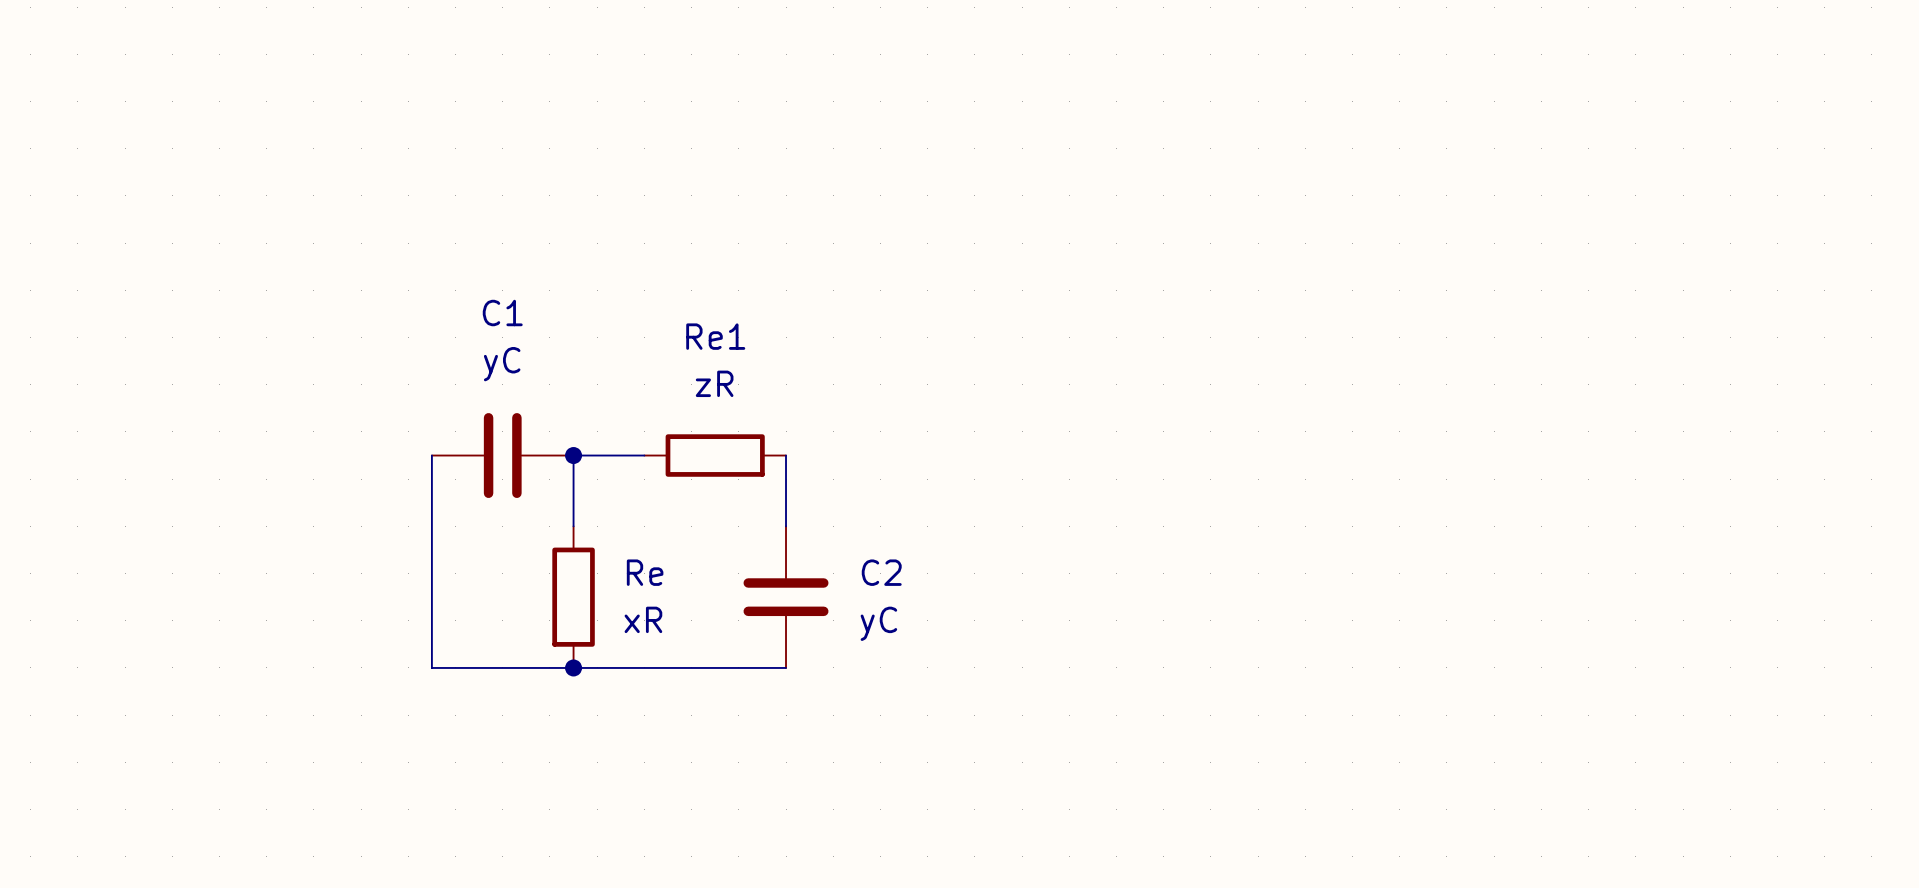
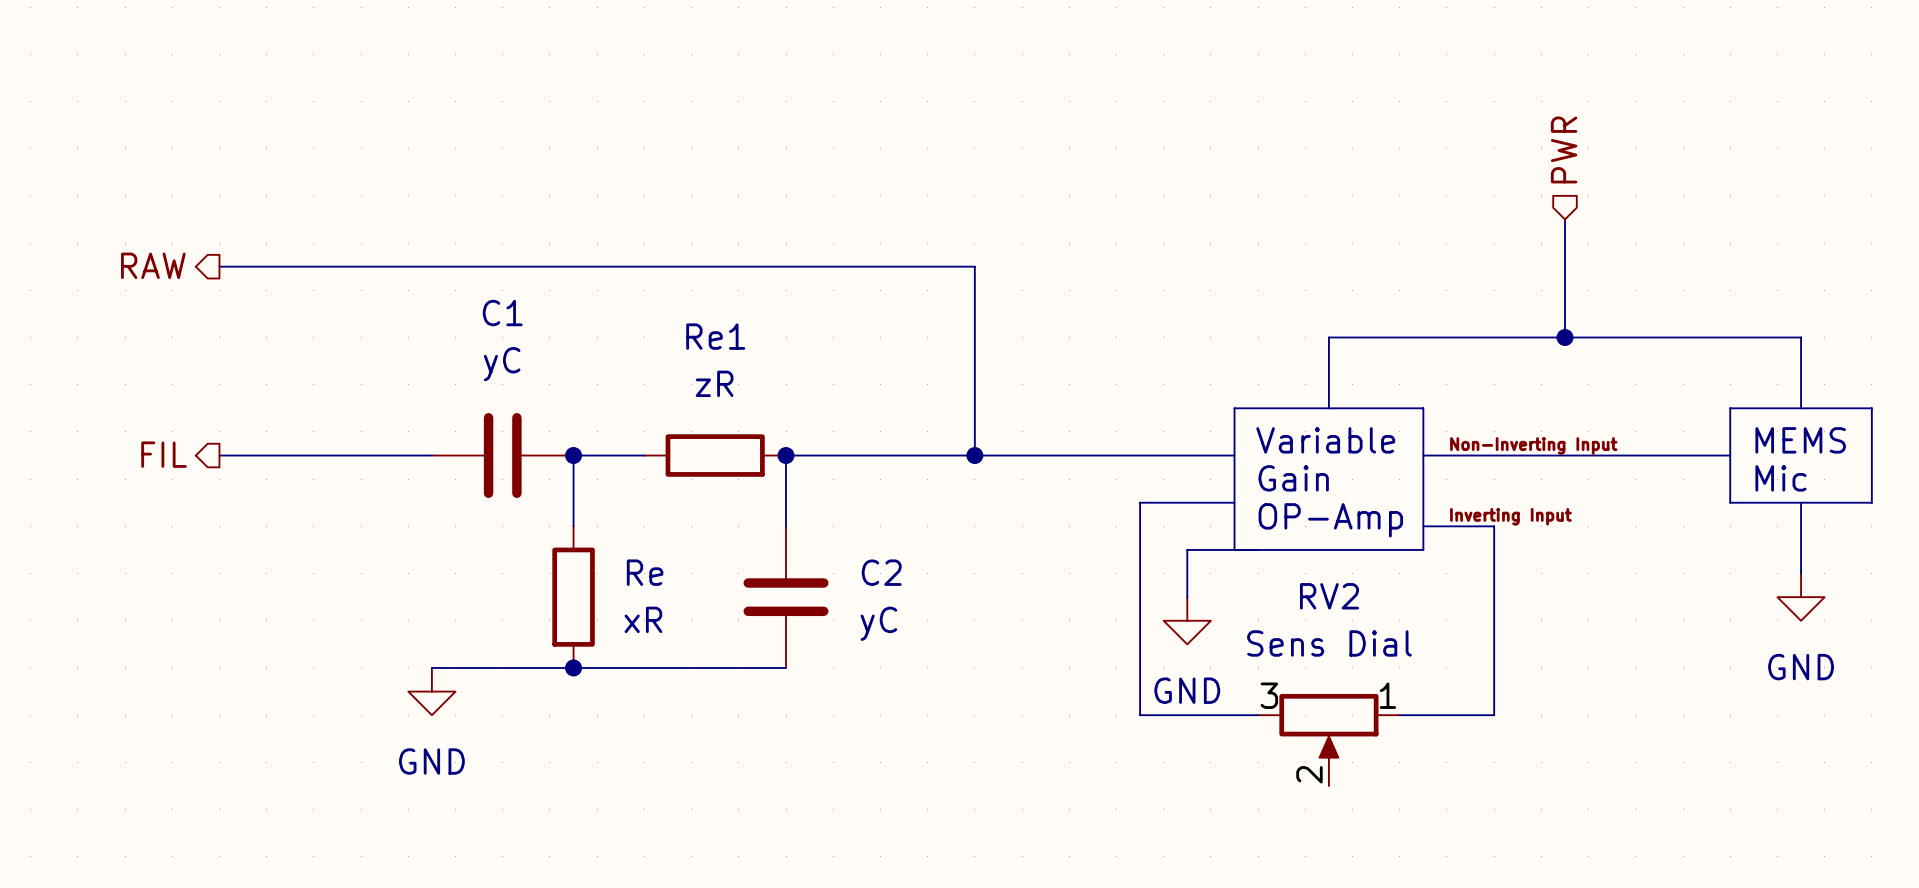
hierarchical label: none -> PWR (1564, 149)
wire: none -> (1564, 219) (1564, 337)
hierarchical label: none -> RAW (153, 265)
wire: none -> (219, 266) (974, 266) (974, 455)
junction: none -> (1564, 337)
line: none -> (1234, 408) (1423, 408) (1423, 549) (1234, 549) (1234, 408)
wire: none -> (1328, 408) (1328, 337) (1801, 337) (1801, 408)
line: none -> (1730, 408) (1871, 408) (1871, 502) (1730, 502) (1730, 408)
text: none -> Variable (1325, 440)
text: none -> MEMS (1800, 440)
label: none -> Non-Inverting Input (1533, 445)
hierarchical label: none -> FIL (164, 454)
wire: (431, 455) (431, 667) -> (431, 455) (219, 455)
wire: none -> (786, 455) (1234, 455)
junction: none -> (786, 455)
junction: none -> (974, 455)
wire: none -> (1423, 455) (1730, 455)
text: none -> Gain (1293, 478)
text: none -> Mic (1781, 478)
wire: none -> (1234, 502) (1140, 502) (1140, 715) (1258, 715)
wire: none -> (1801, 502) (1801, 573)
label: none -> Inverting Input (1510, 516)
text: none -> OP-Amp (1330, 520)
wire: none -> (1423, 526) (1494, 526) (1494, 715) (1399, 715)
wire: none -> (1258, 549) (1187, 549) (1187, 597)
power symbol: none -> GND (1801, 597)
power symbol: none -> GND (1187, 620)
power symbol: none -> GND (431, 691)
RV2: none -> Sens Dial (1328, 739)

